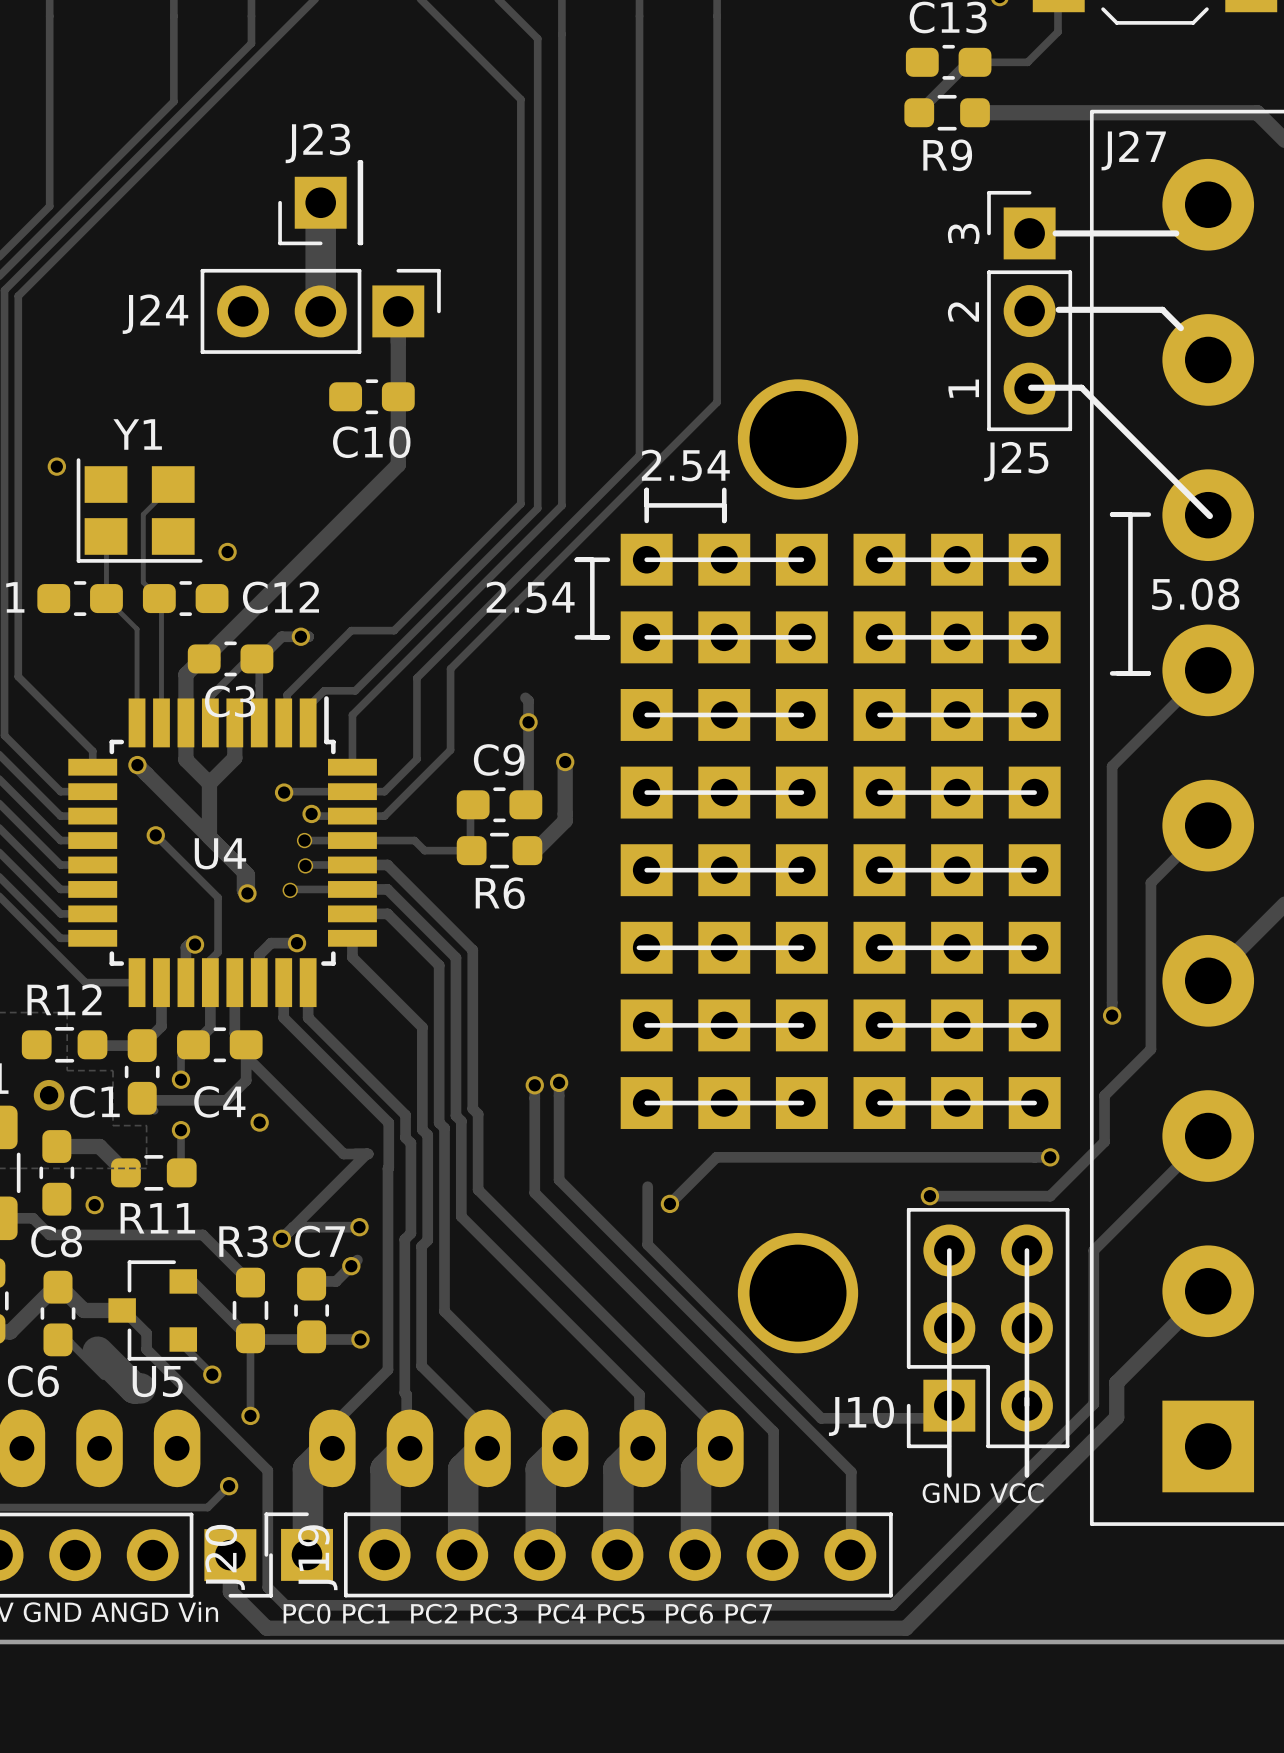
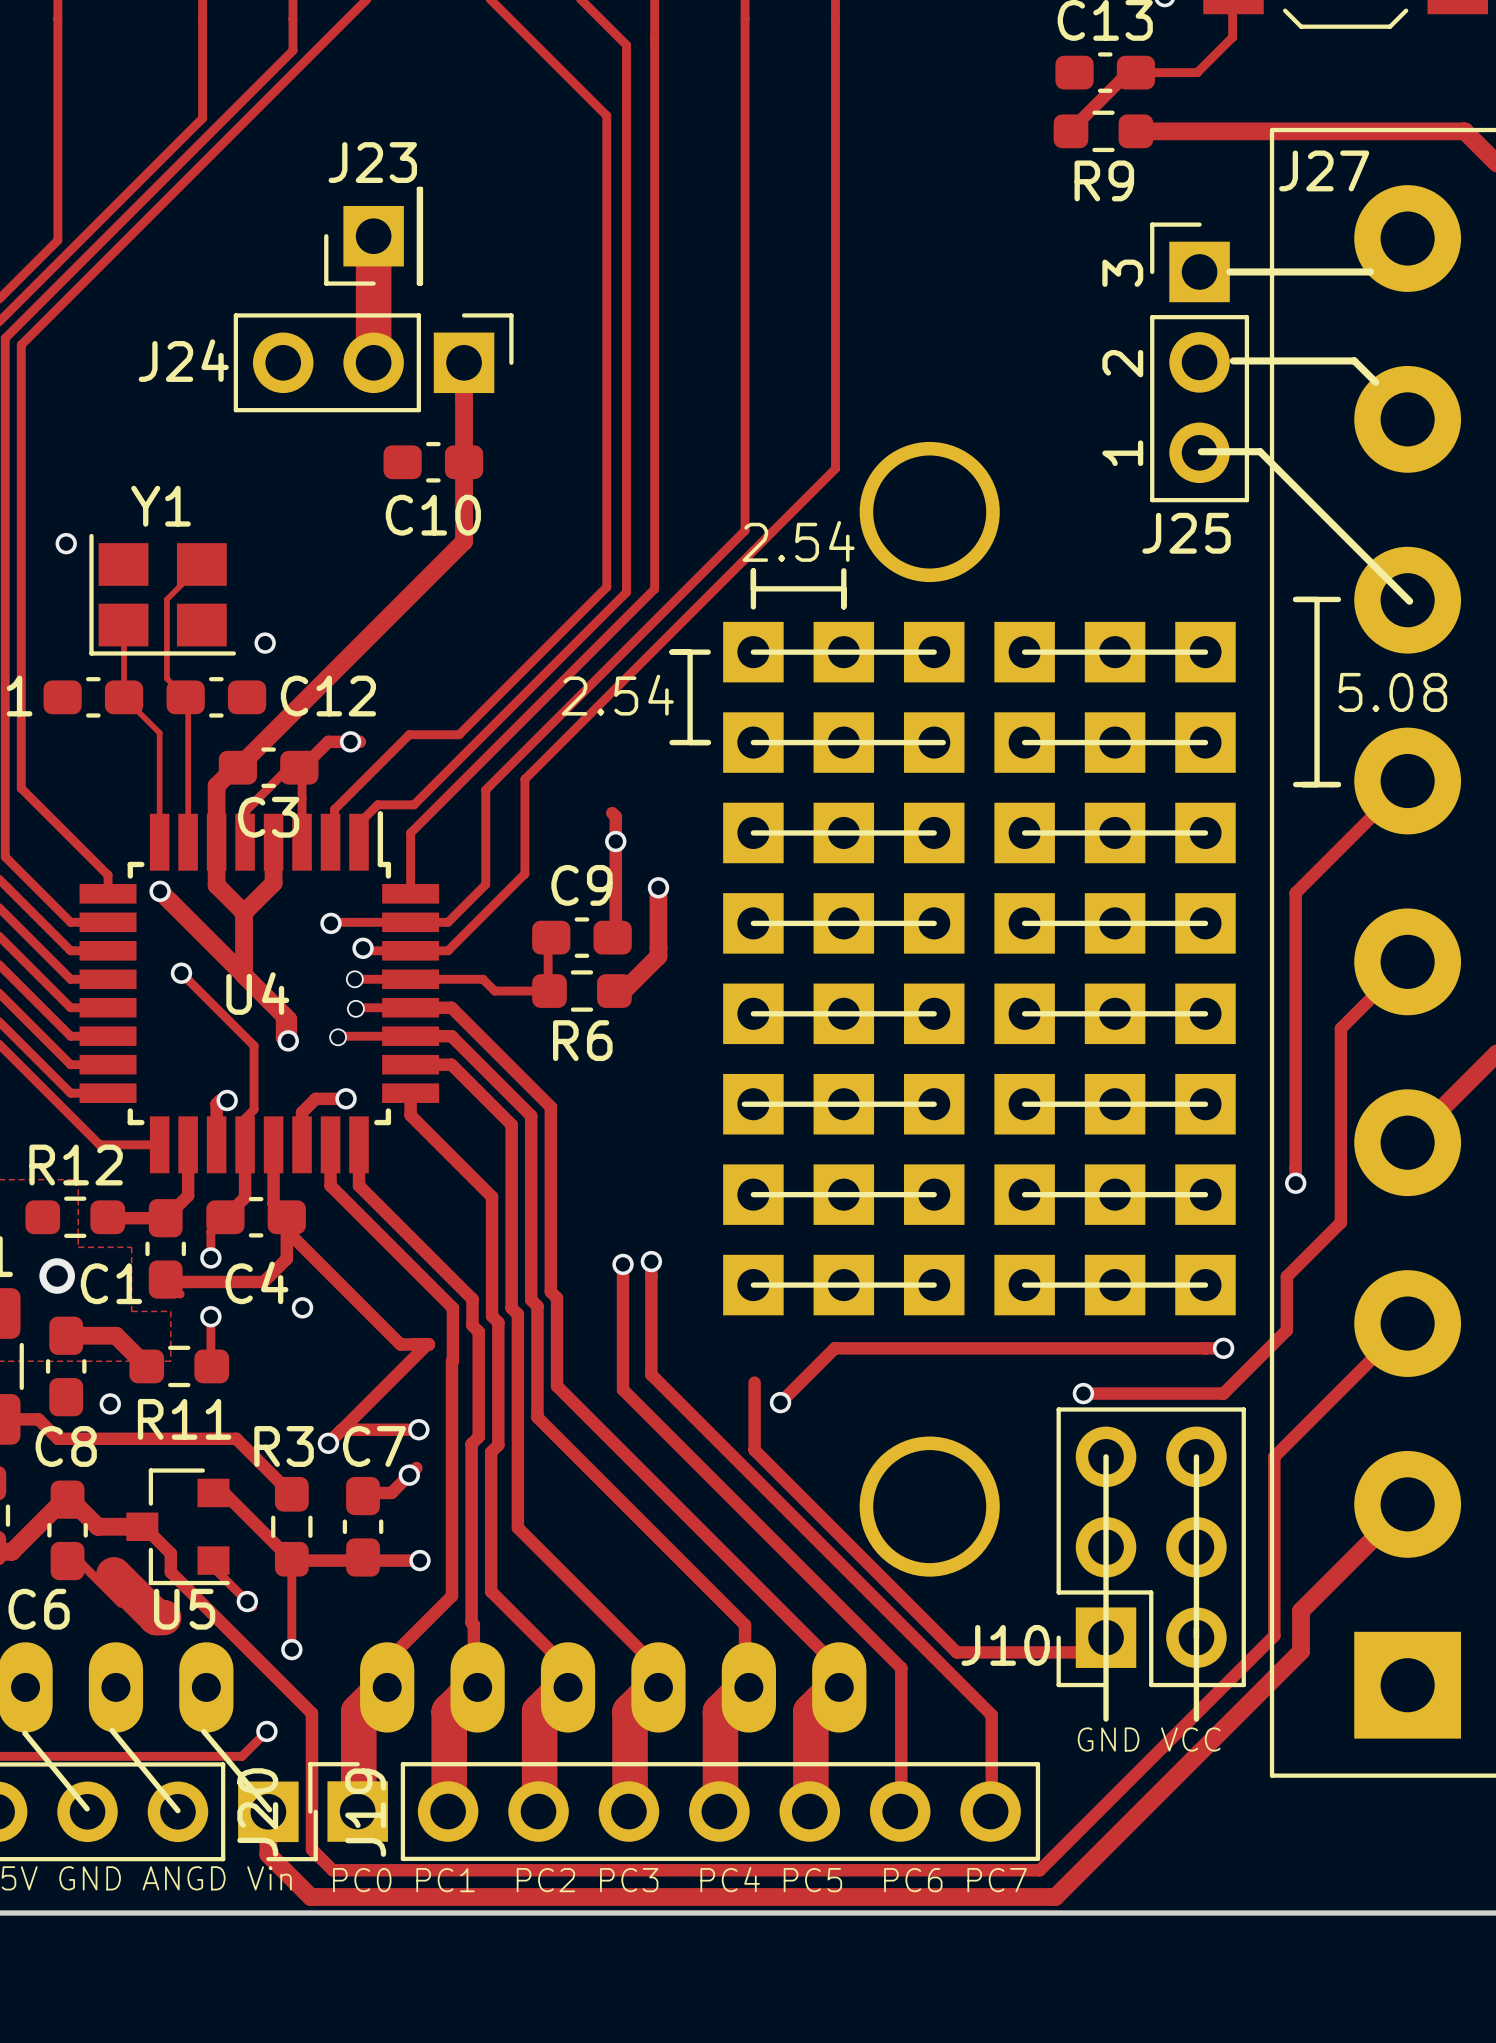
line: none -> (112, 1730) (177, 1810)
line: none -> (203, 1731) (269, 1809)
line: none -> (24, 1733) (87, 1808)

